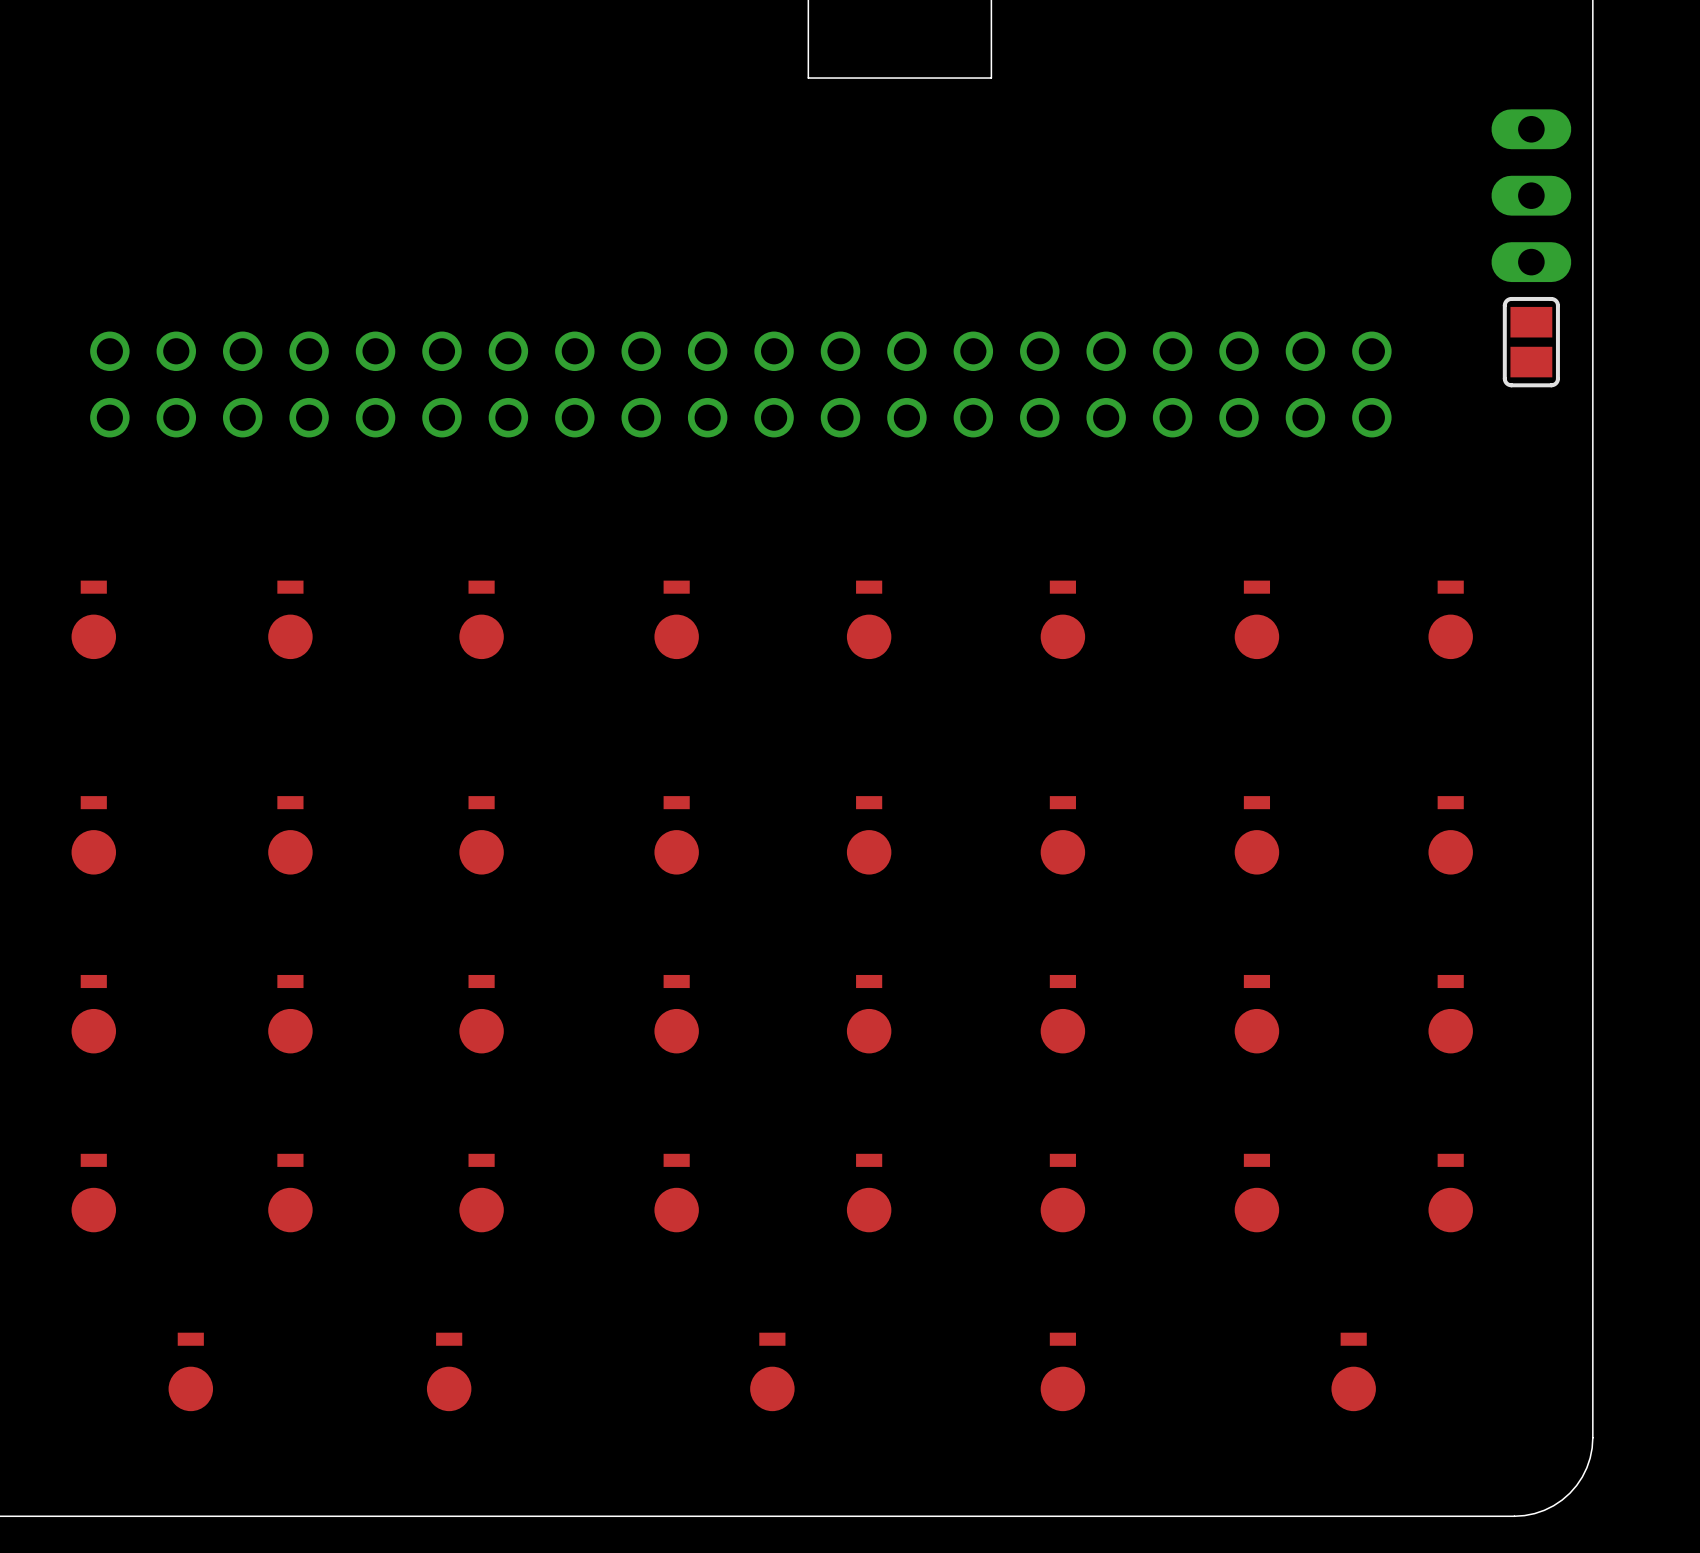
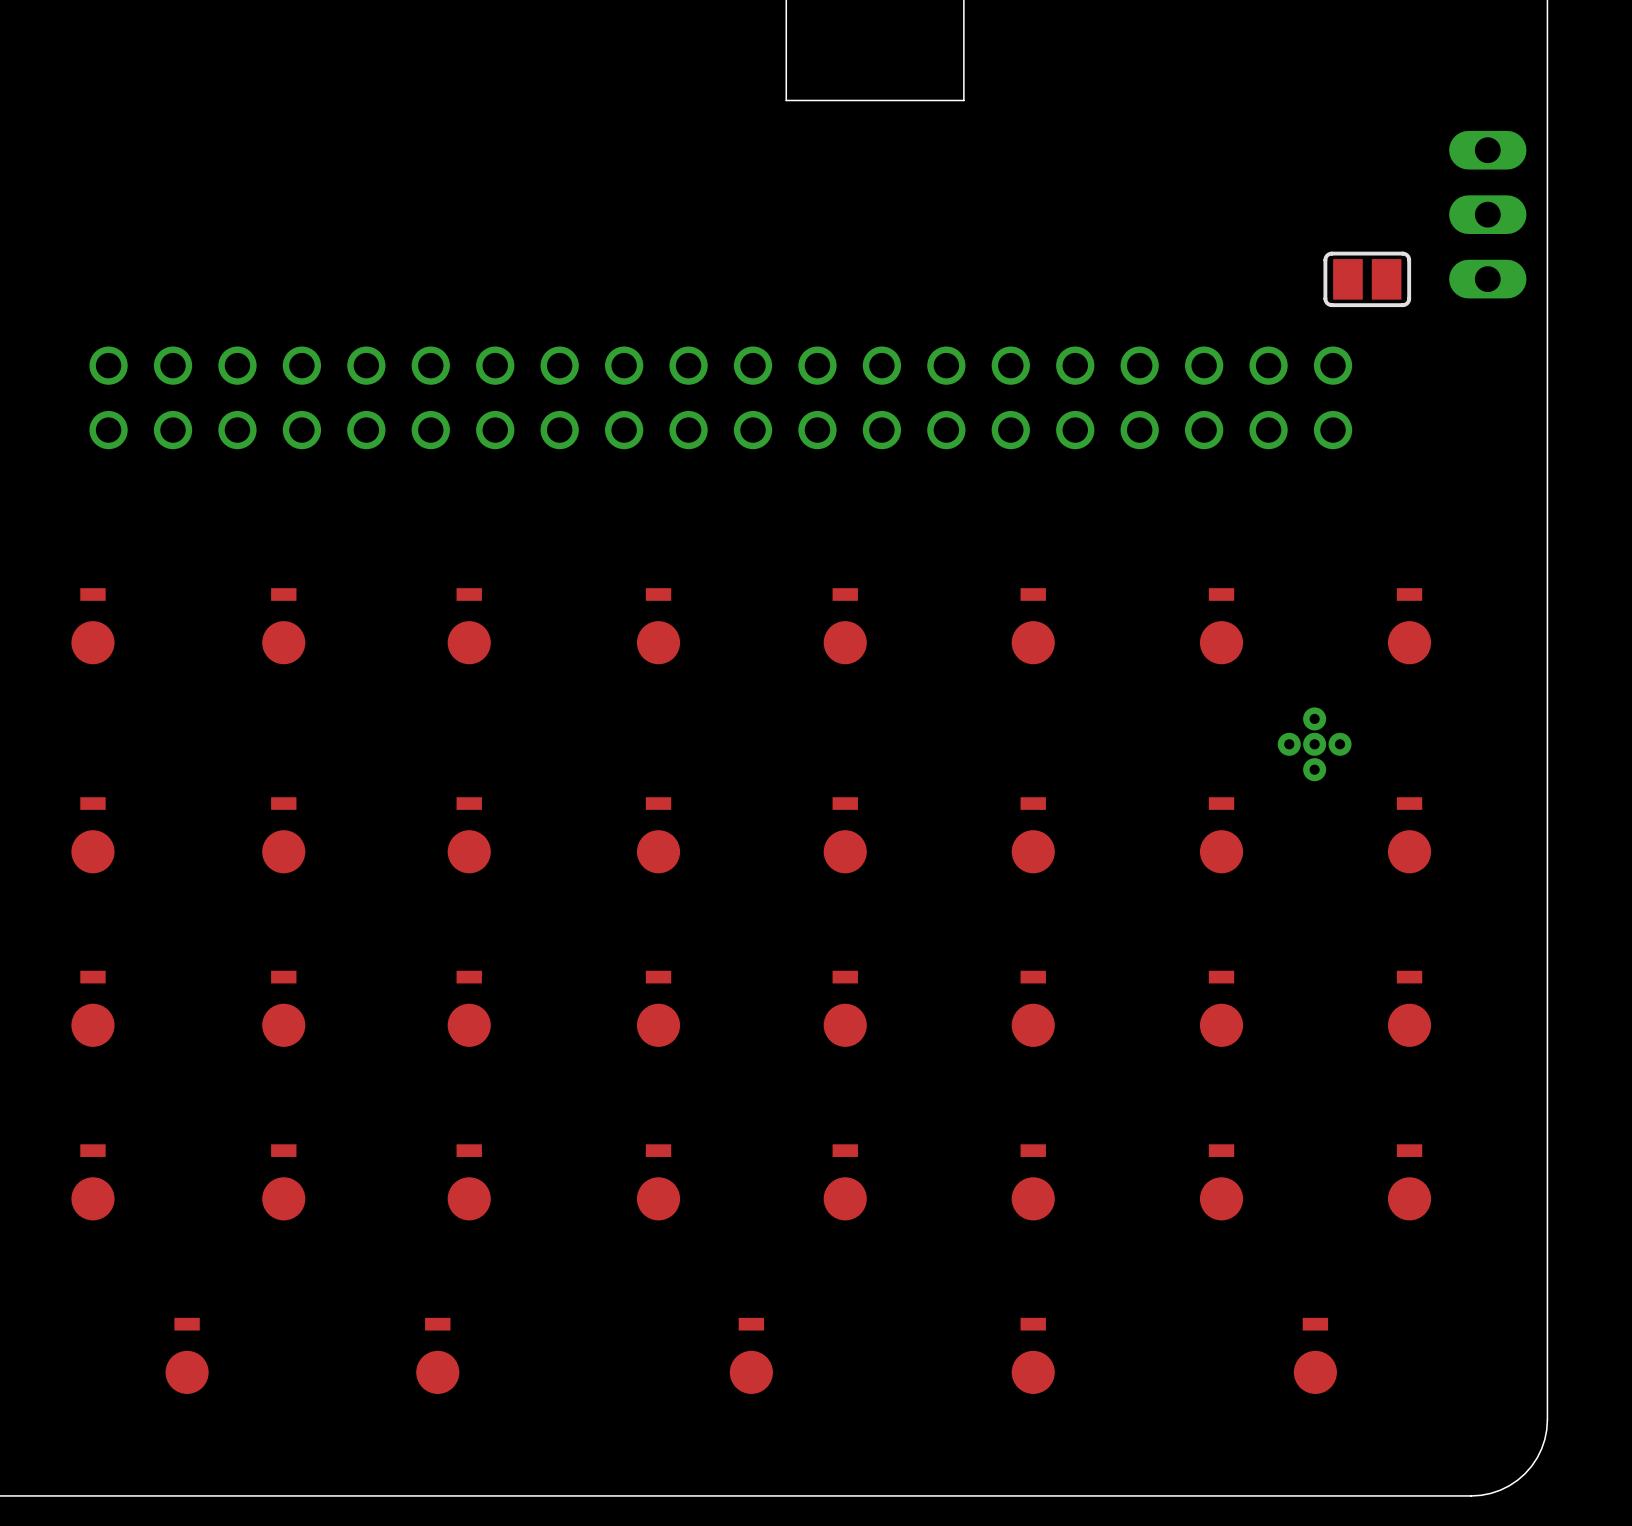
part rotation: 0° (1531, 342) -> 90° clockwise (1367, 279)
part position: (1531, 342) -> (1367, 279)
part: none -> (1314, 744)

